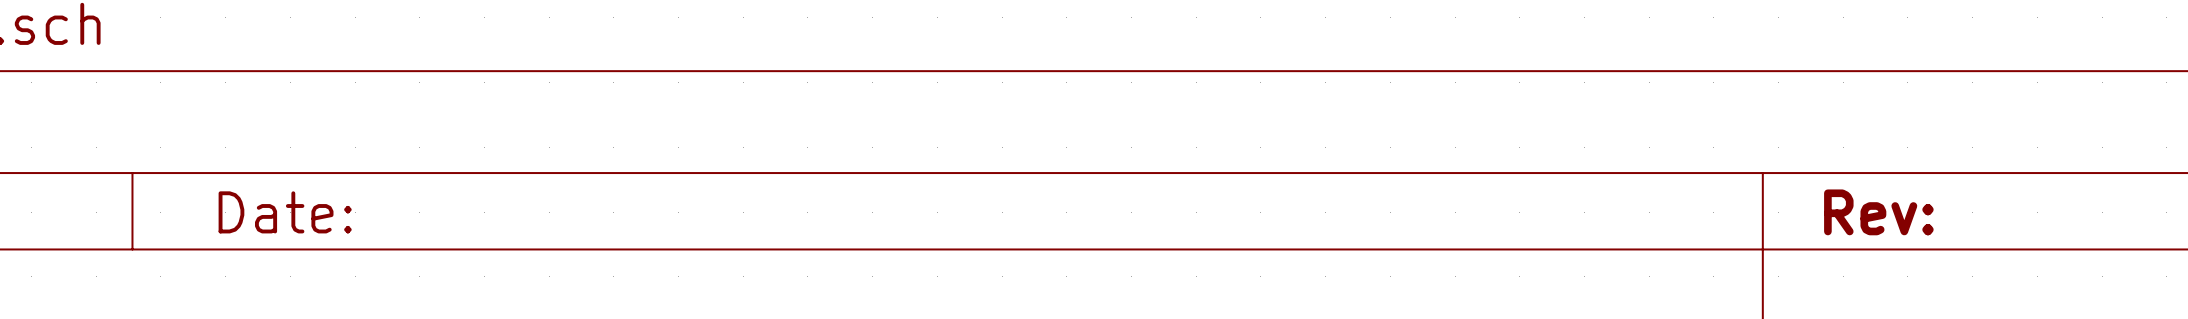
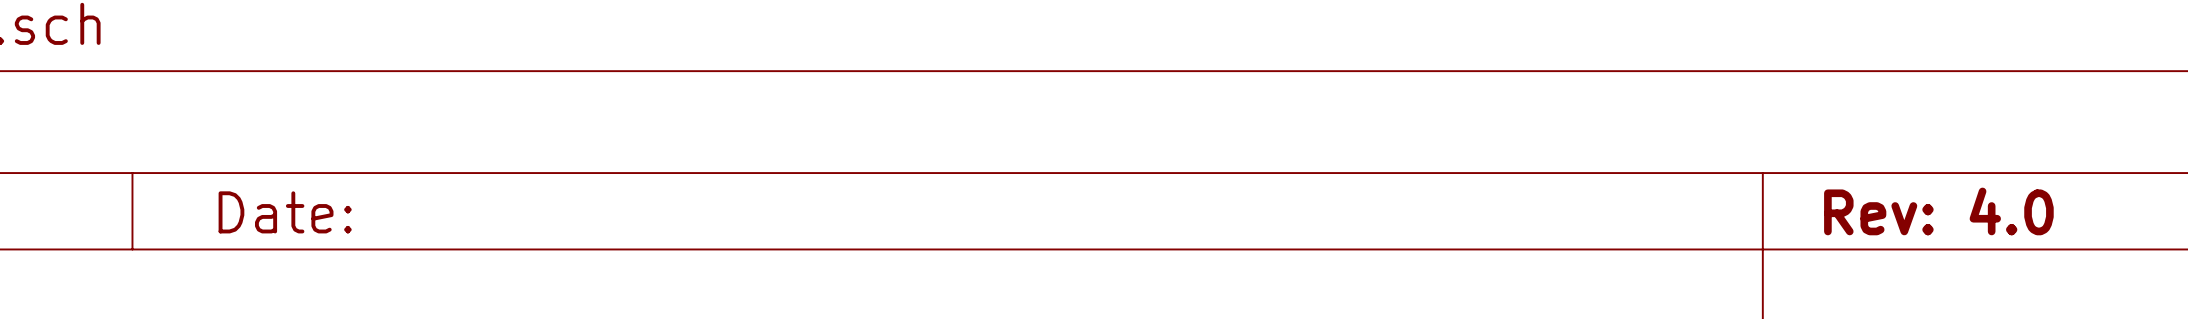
title block: Rev: (1878, 212) -> Rev: 4.0 (1938, 211)

